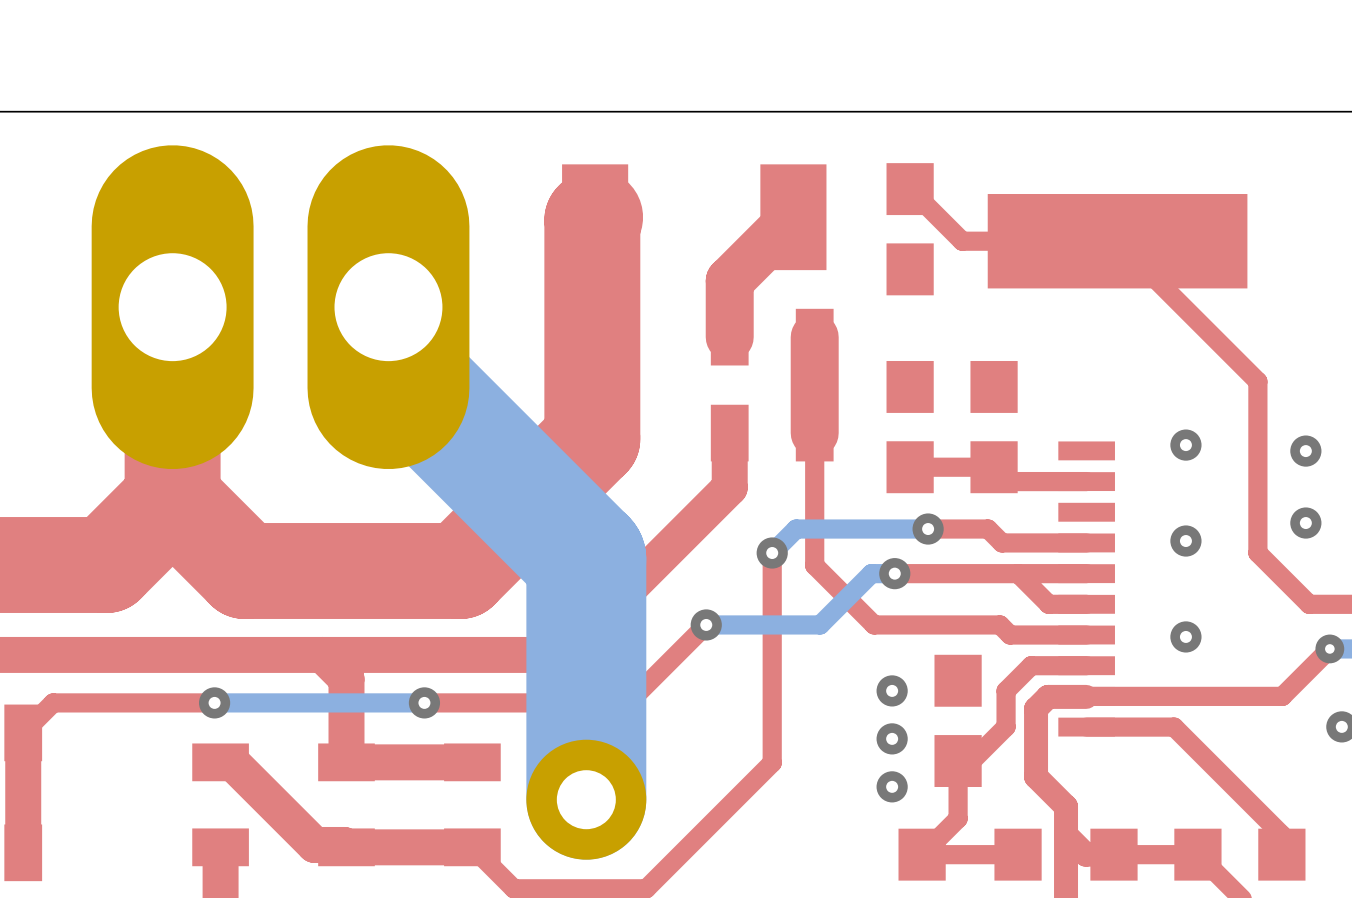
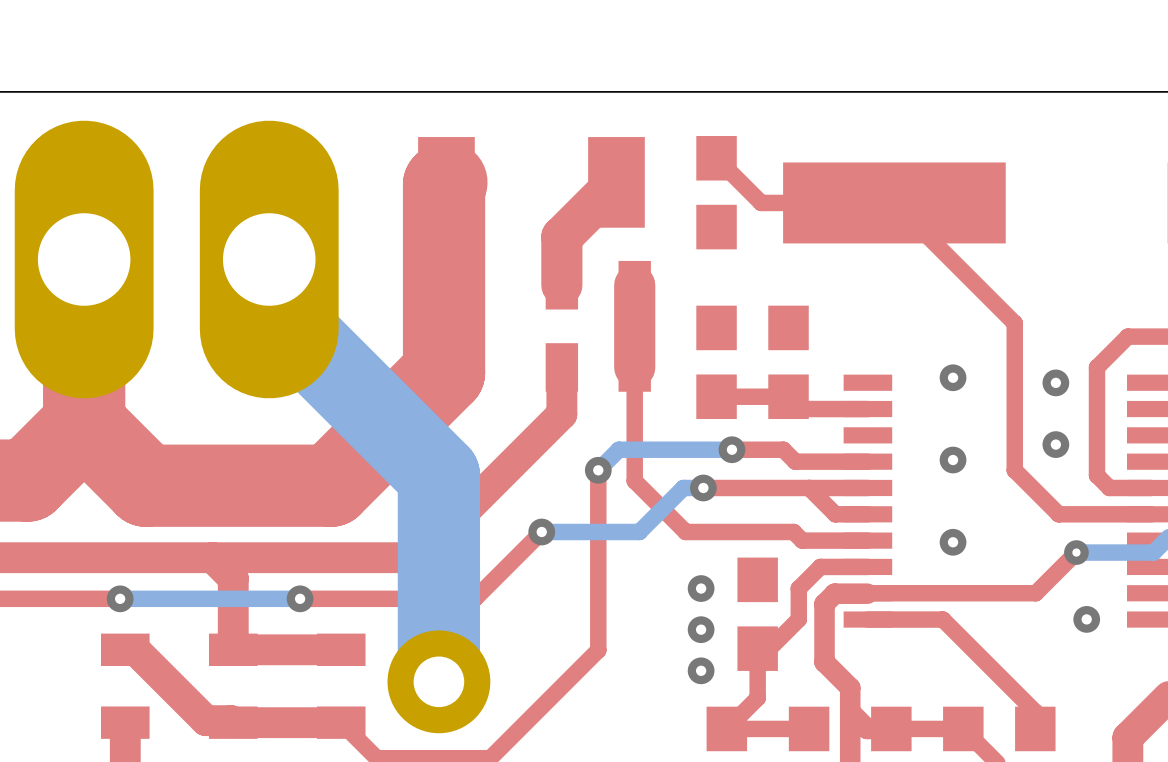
bottom track width: thick (388, 307) (388, 361) (586, 559) (586, 799) -> thin (269, 259) (269, 305) (438, 475) (438, 681)

